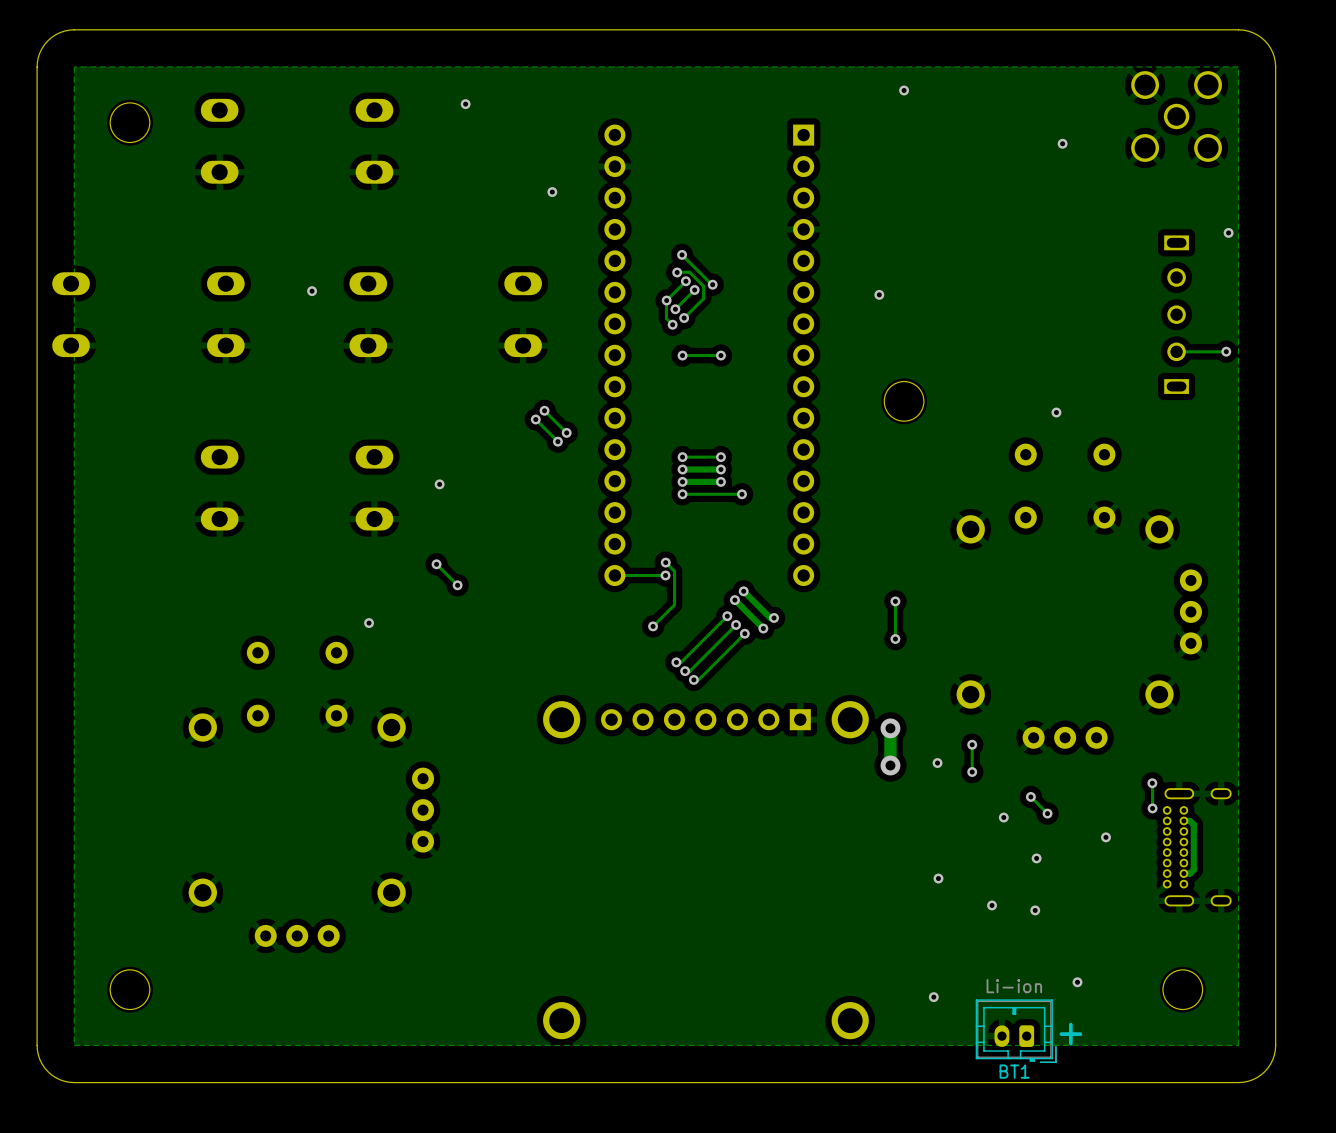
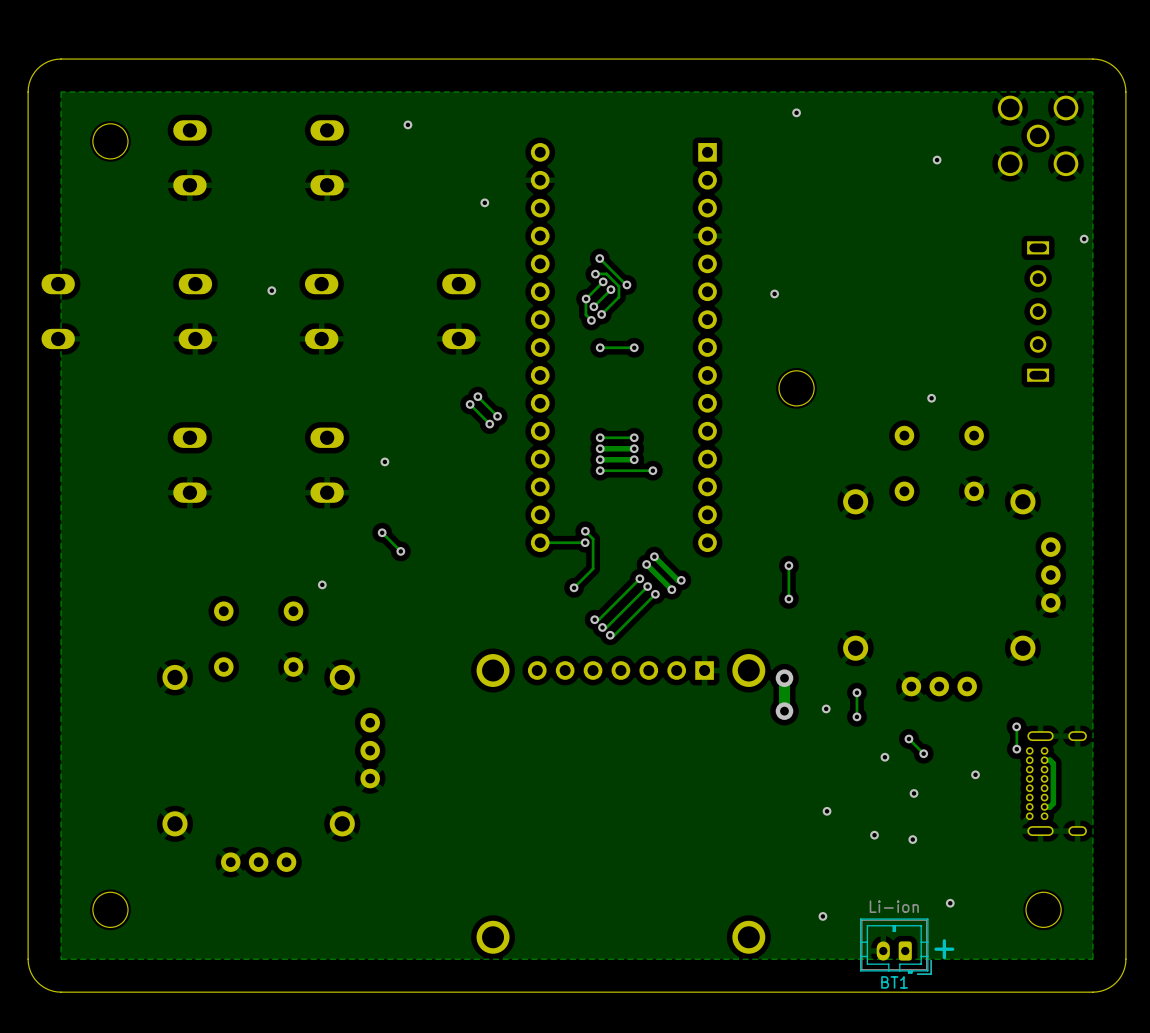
track: (1226, 351) (1176, 351) -> none
via: (1226, 351) -> none

